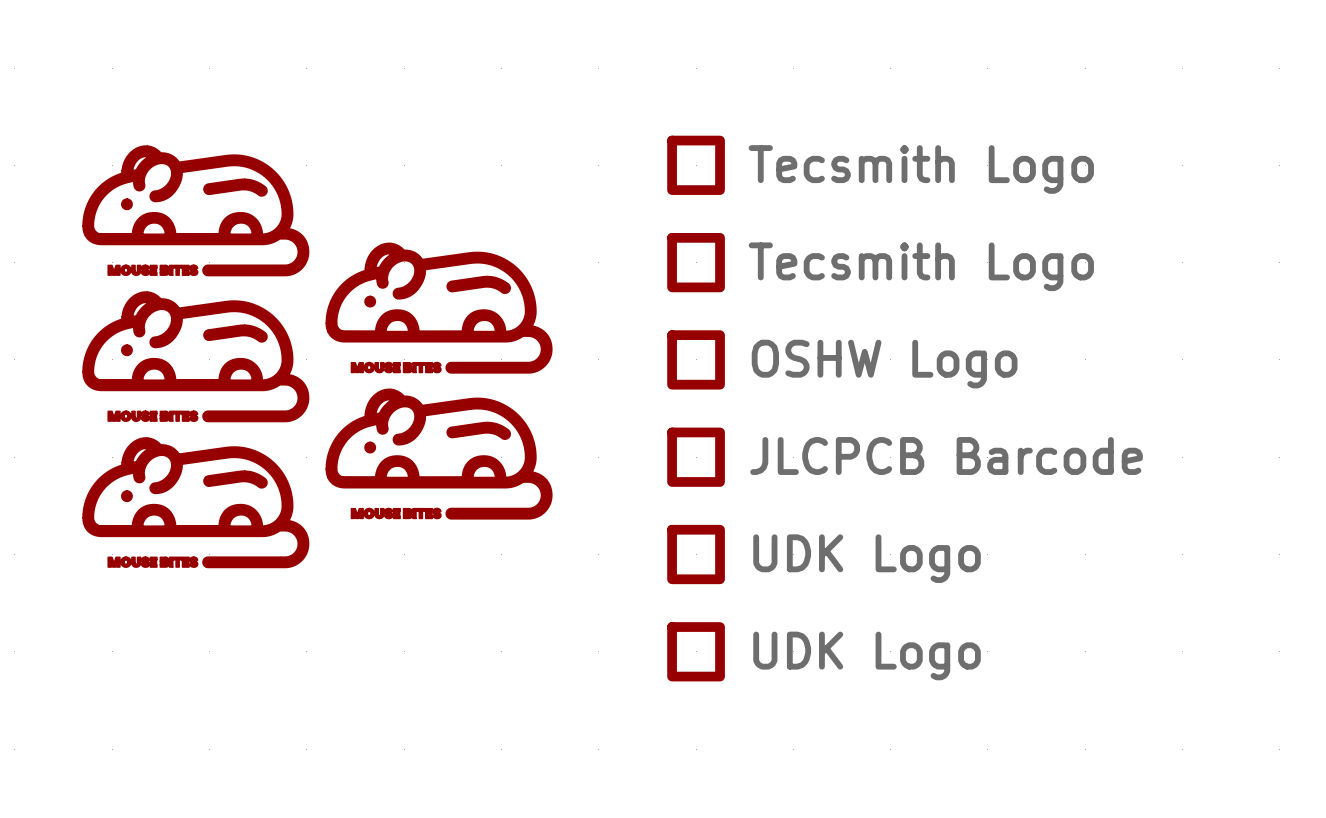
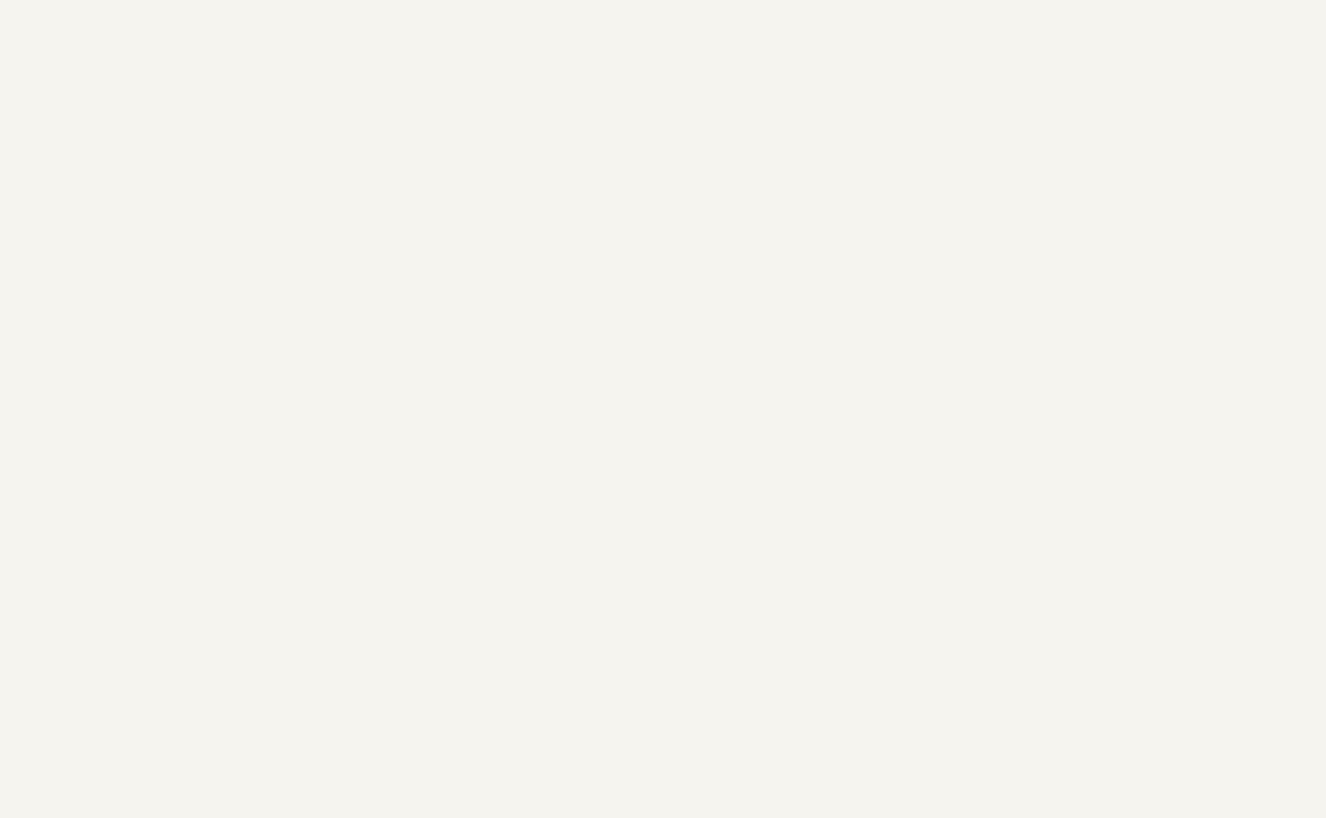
part: Tecsmith Logo (696, 165) -> none
part: (195, 210) -> none
part: Tecsmith Logo (696, 262) -> none
part: (439, 308) -> none
part: (195, 356) -> none
part: OSHW Logo (696, 359) -> none
part: (439, 454) -> none
part: JLCPCB Barcode (696, 457) -> none
part: (195, 502) -> none
part: UDK Logo (696, 554) -> none
part: UDK Logo (696, 651) -> none

